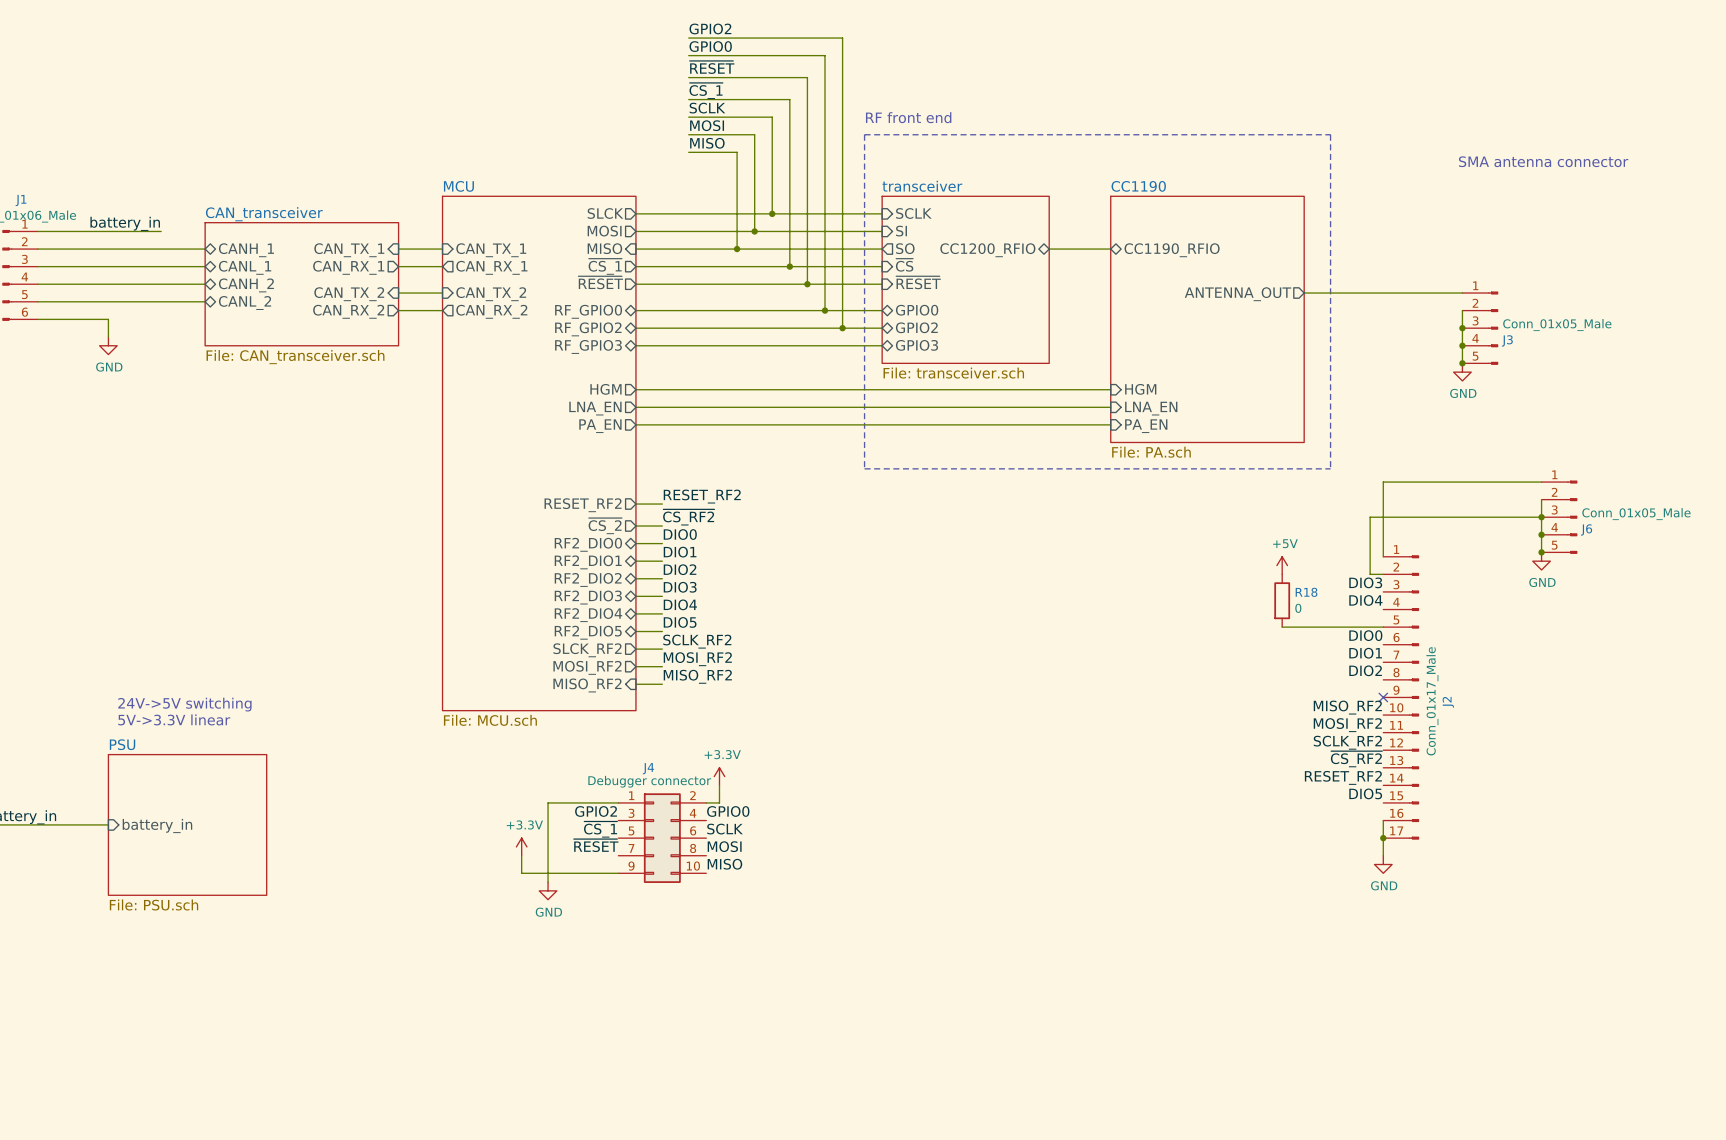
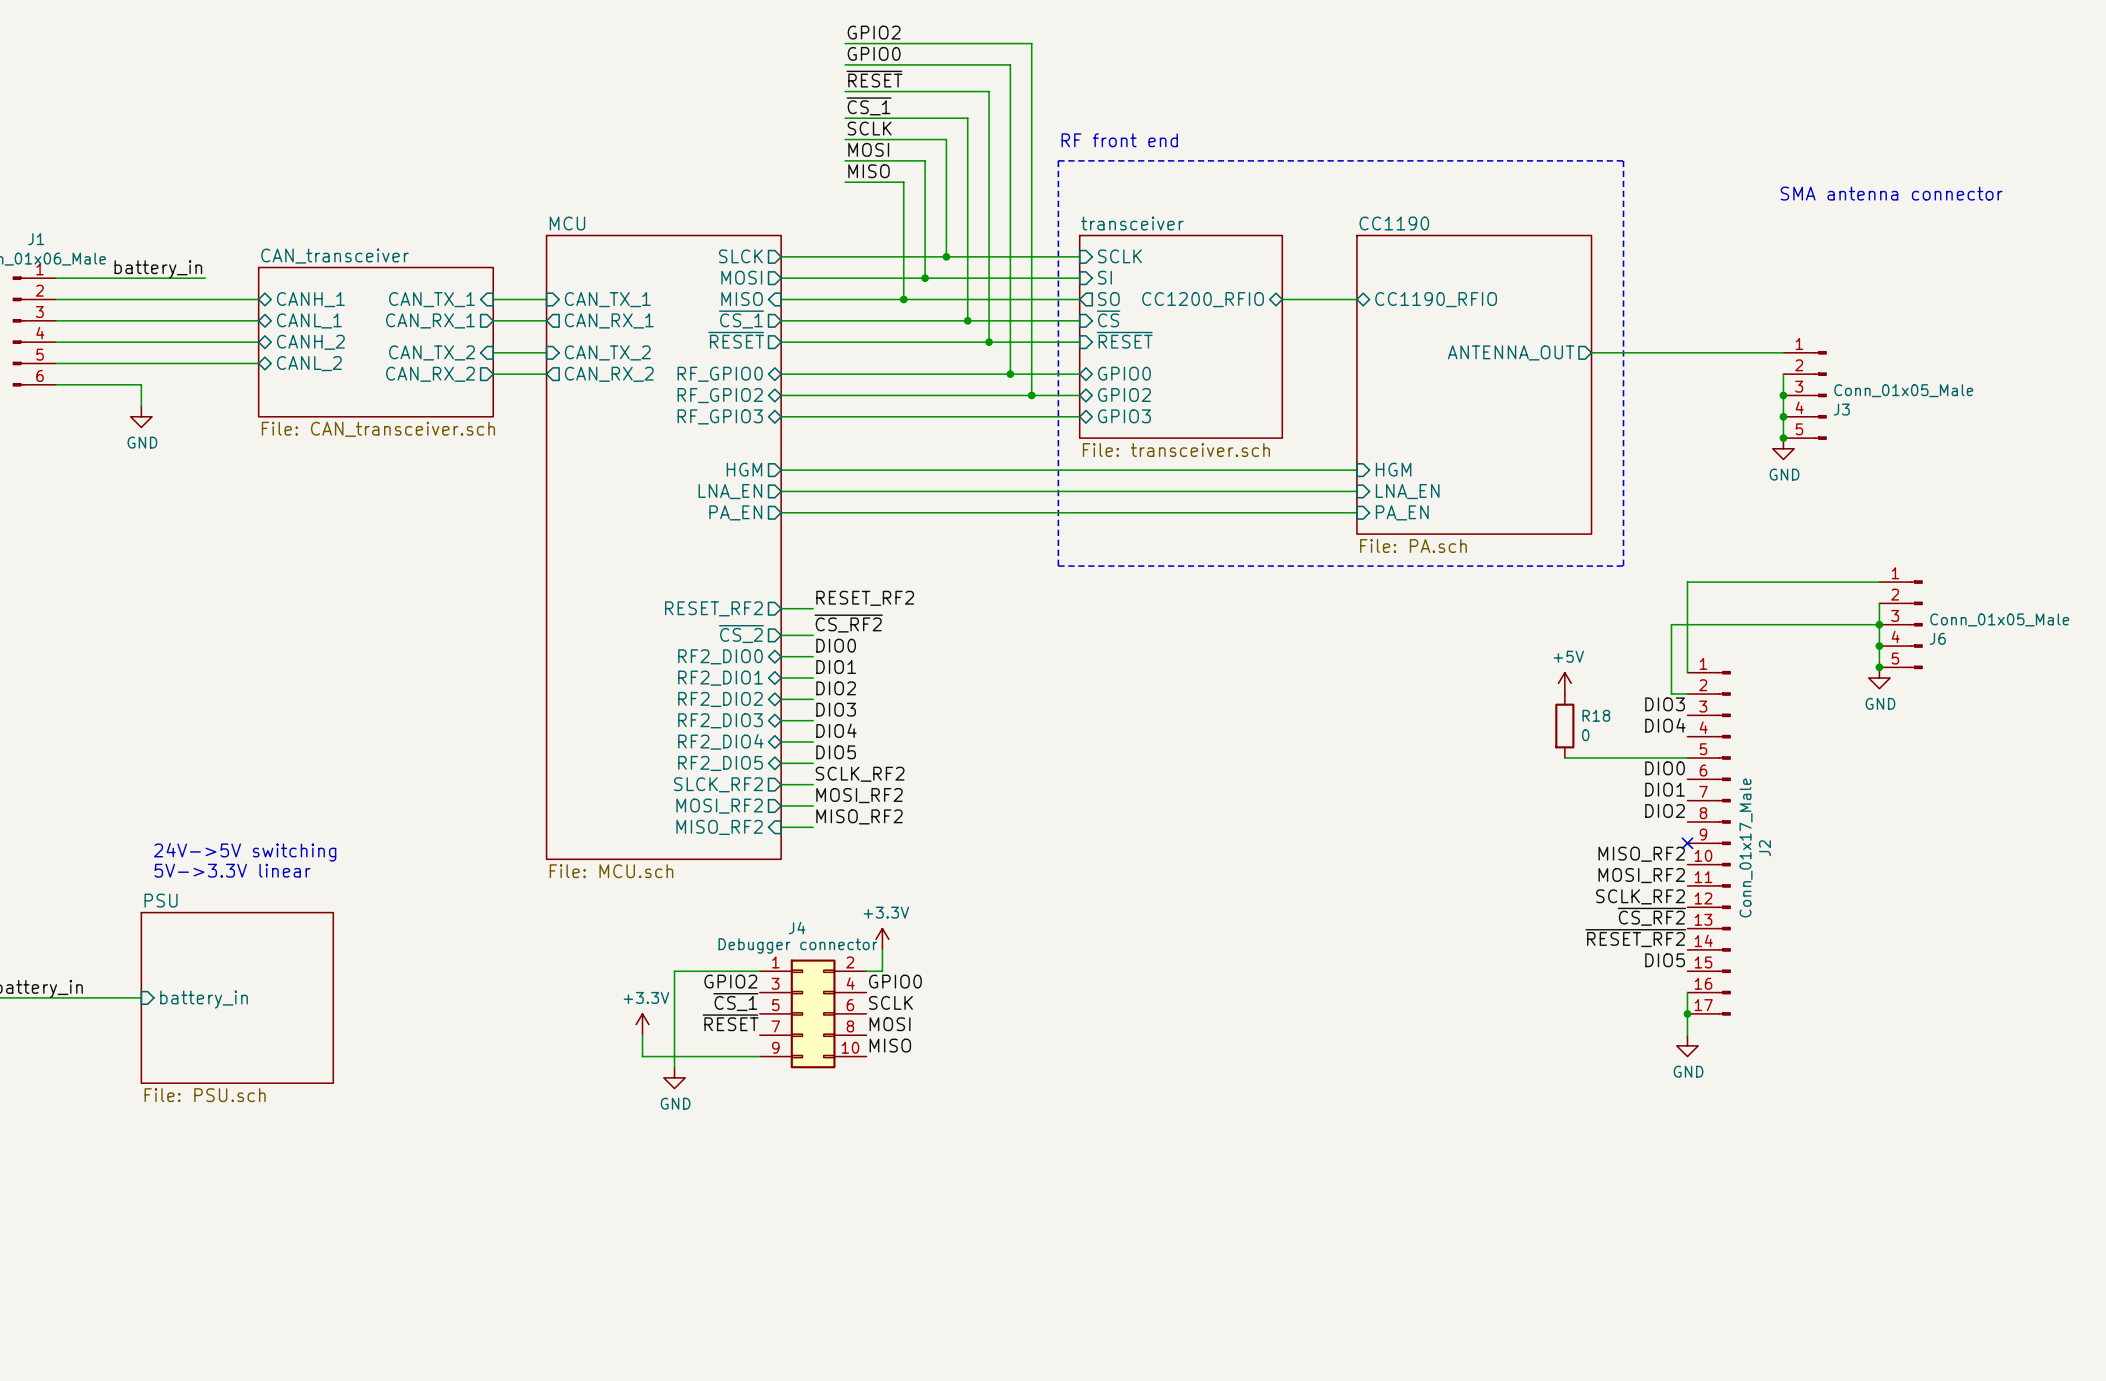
label: RESET_RF2 (1343, 777) -> ~{RESET_RF2} (1635, 938)

